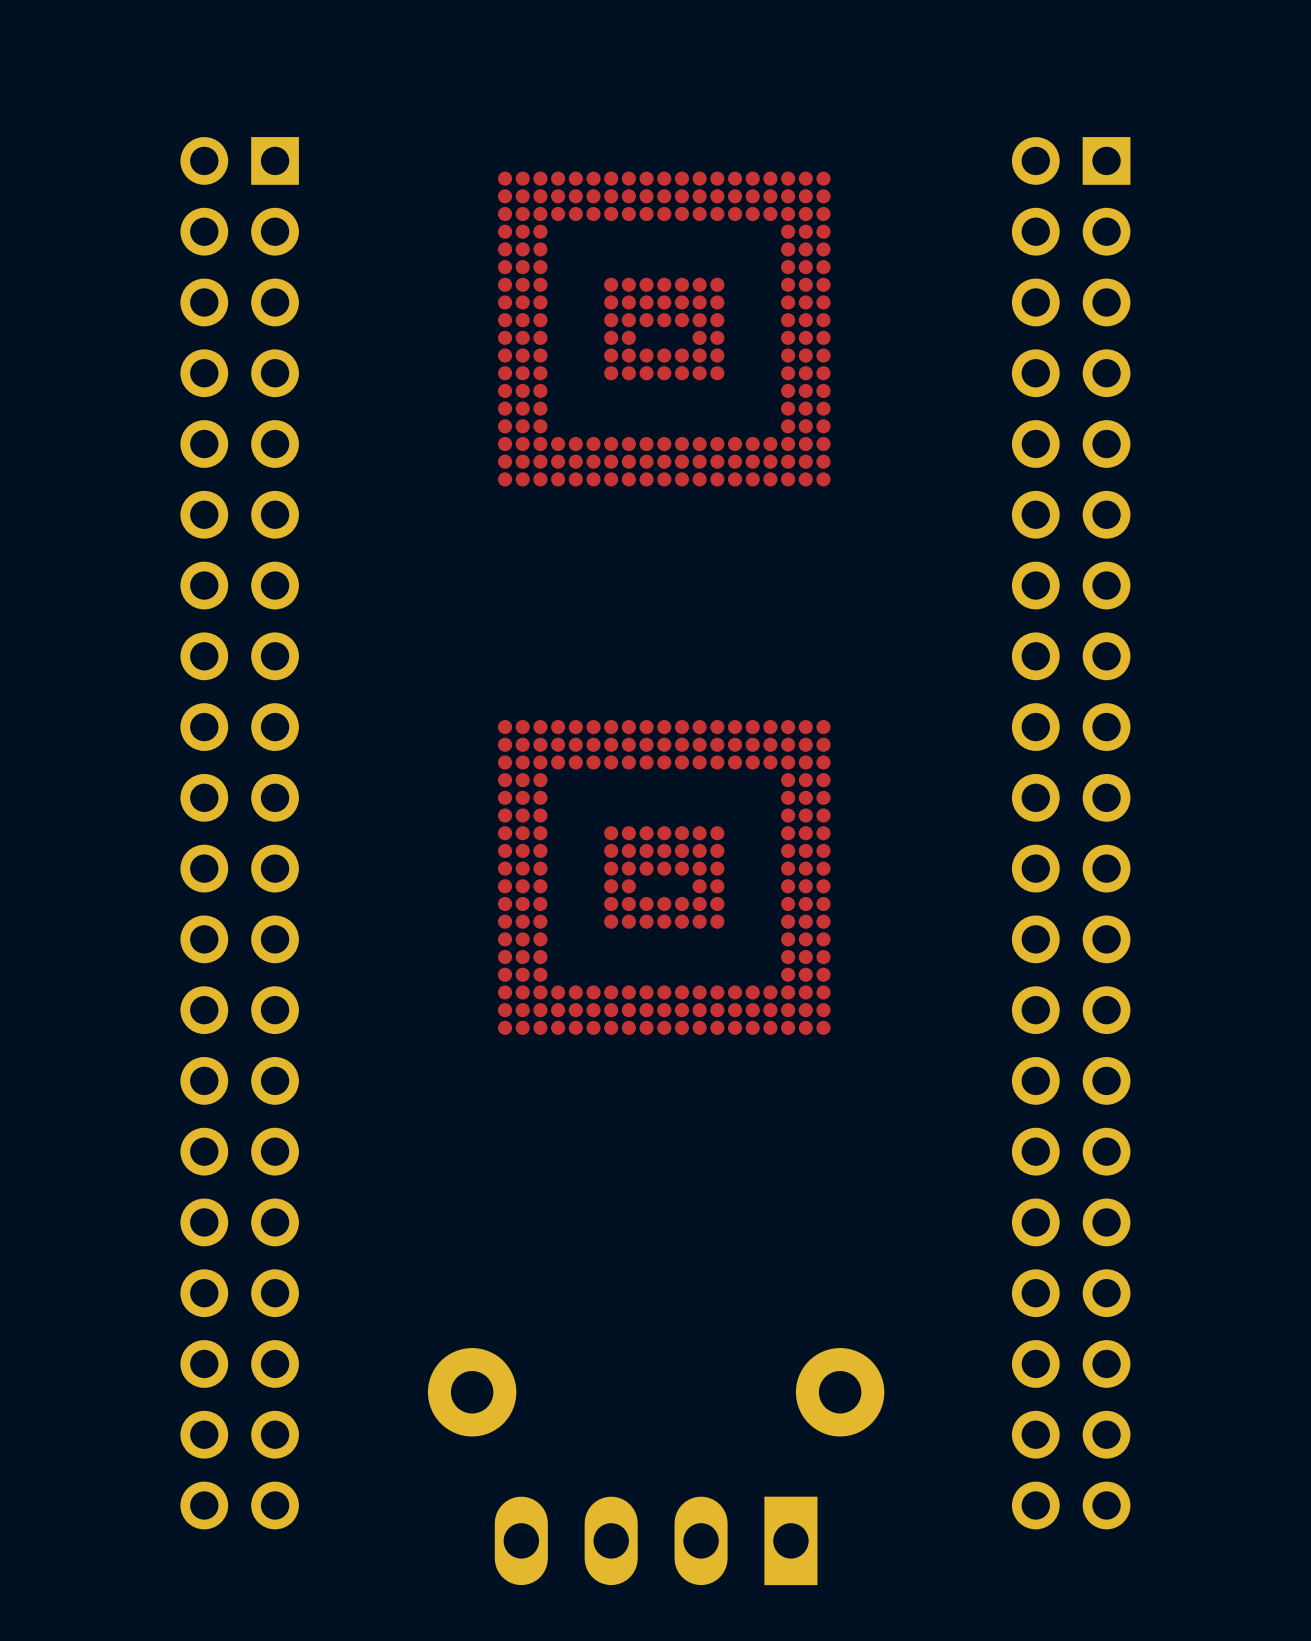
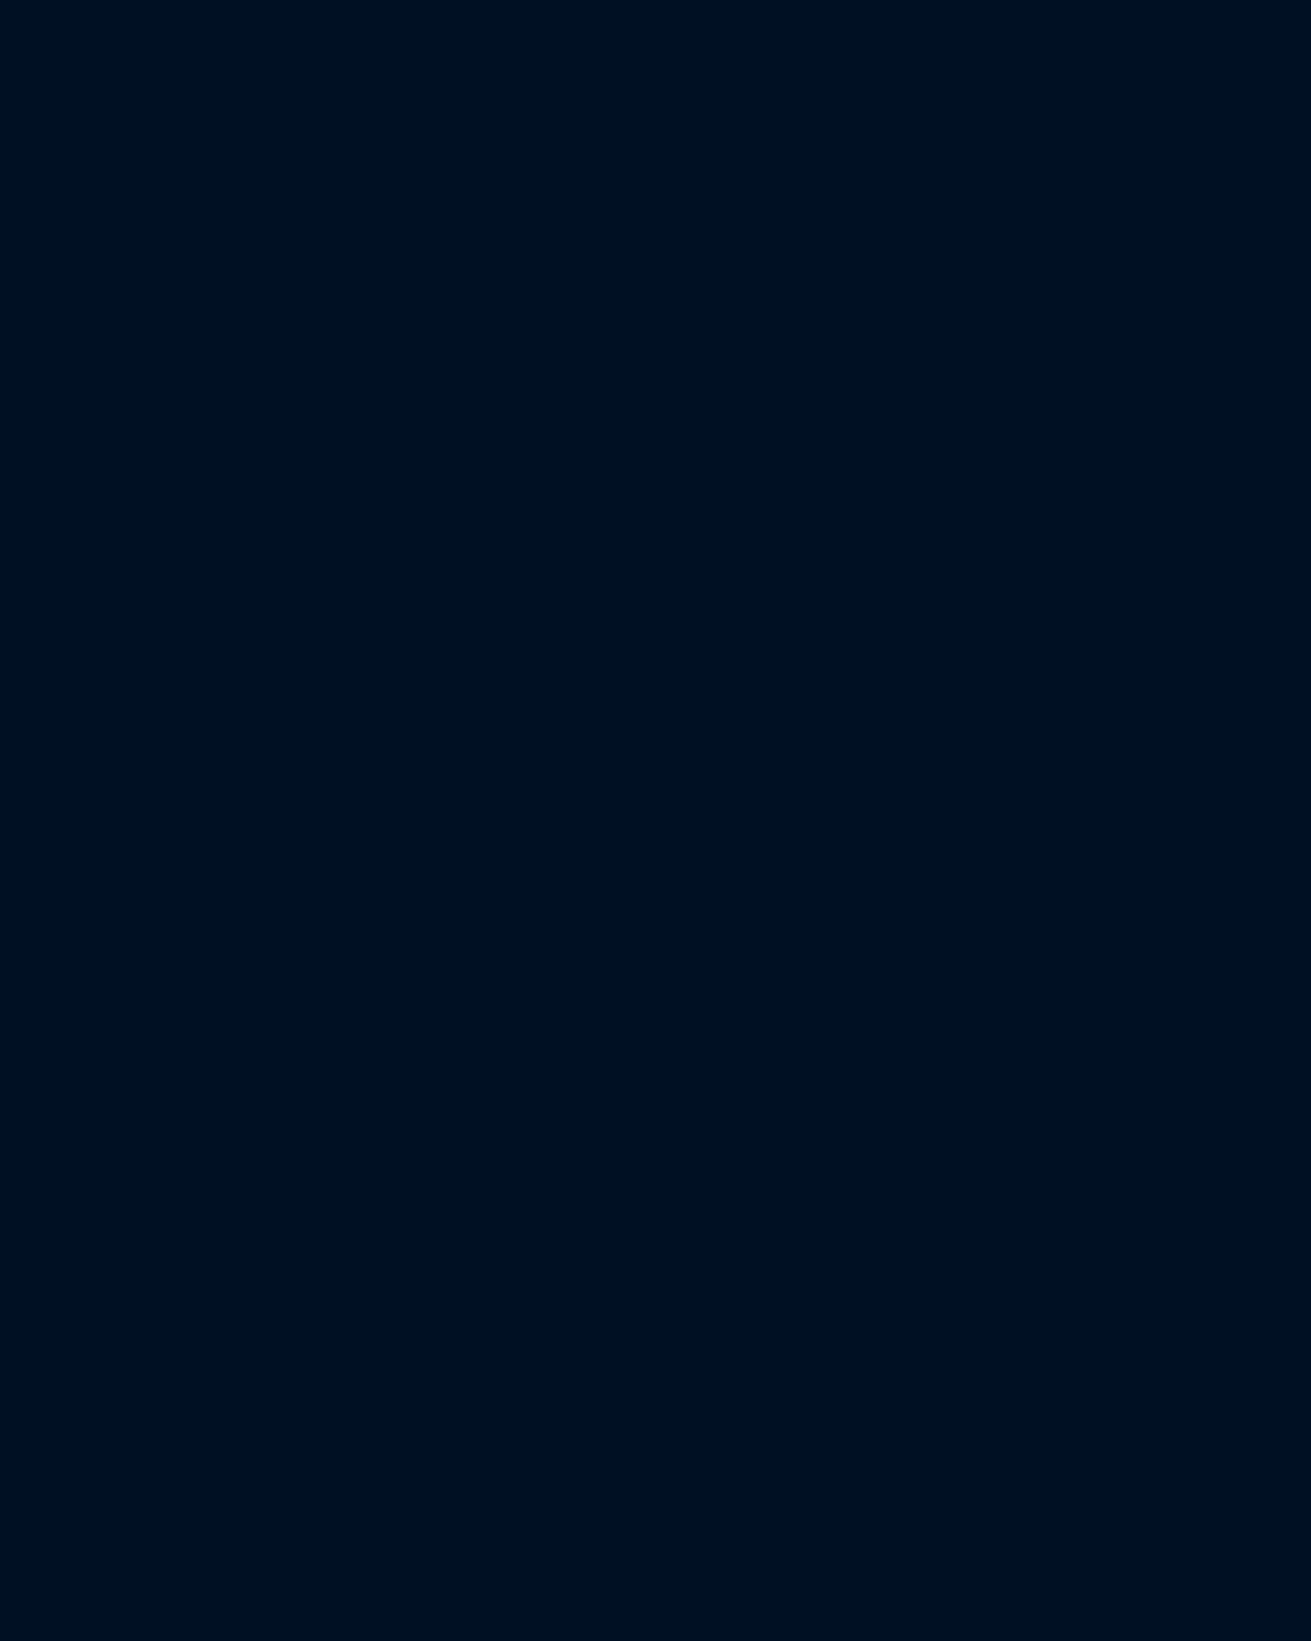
part: (664, 329) -> none
part: (239, 833) -> none
part: (1071, 833) -> none
part: (664, 877) -> none
part: (656, 1466) -> none

